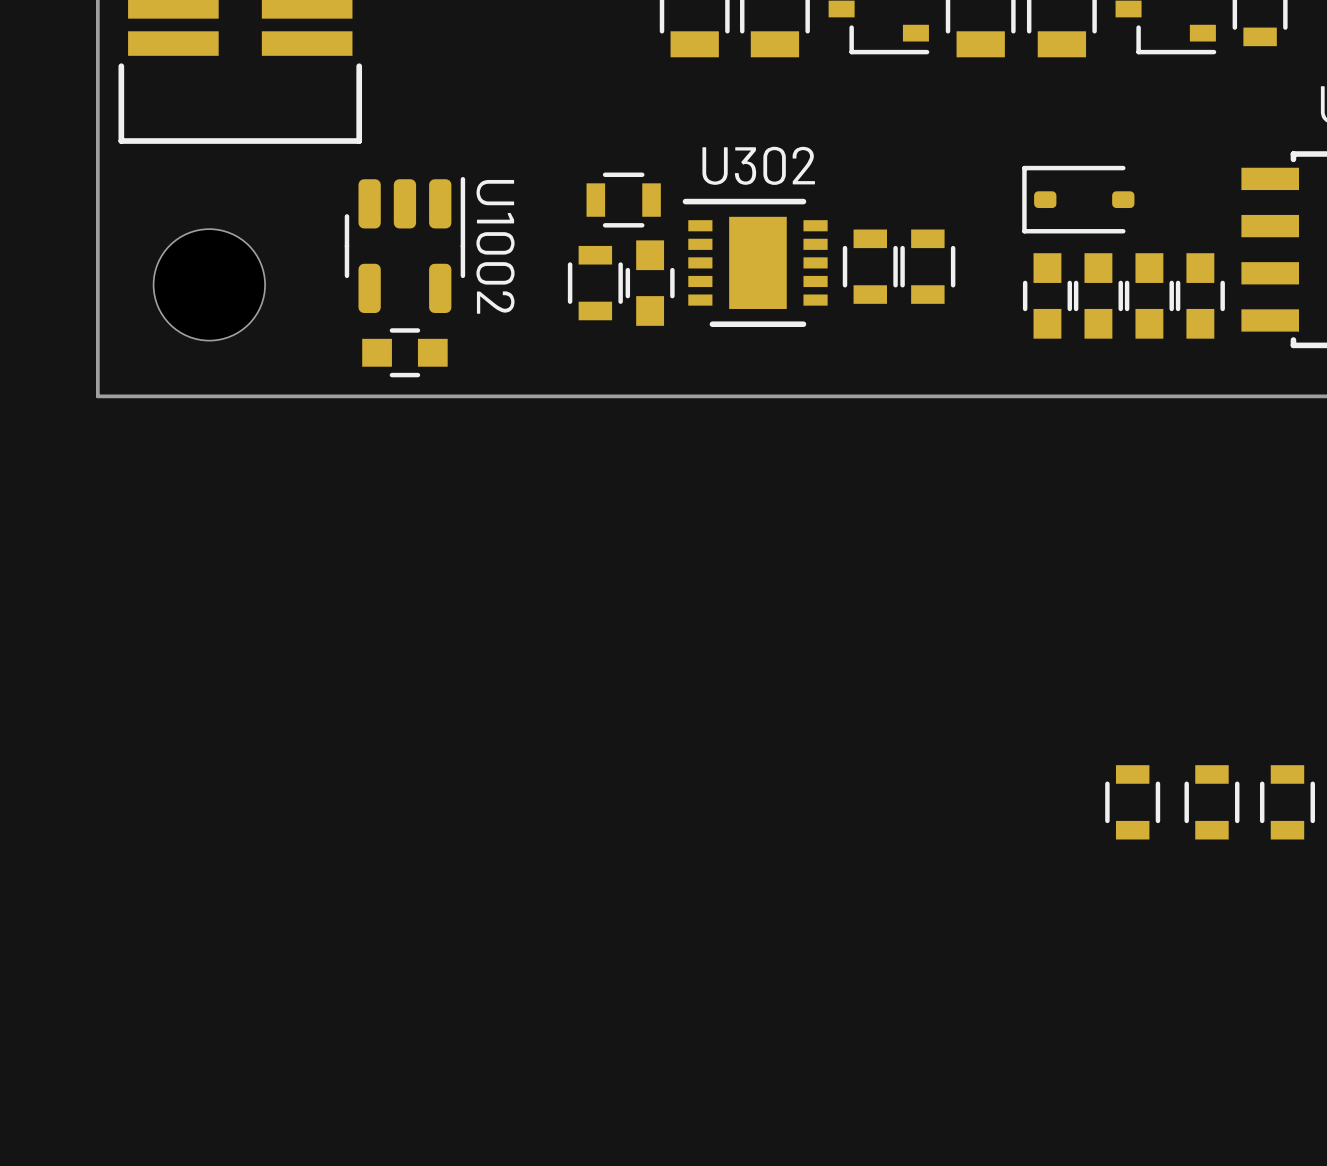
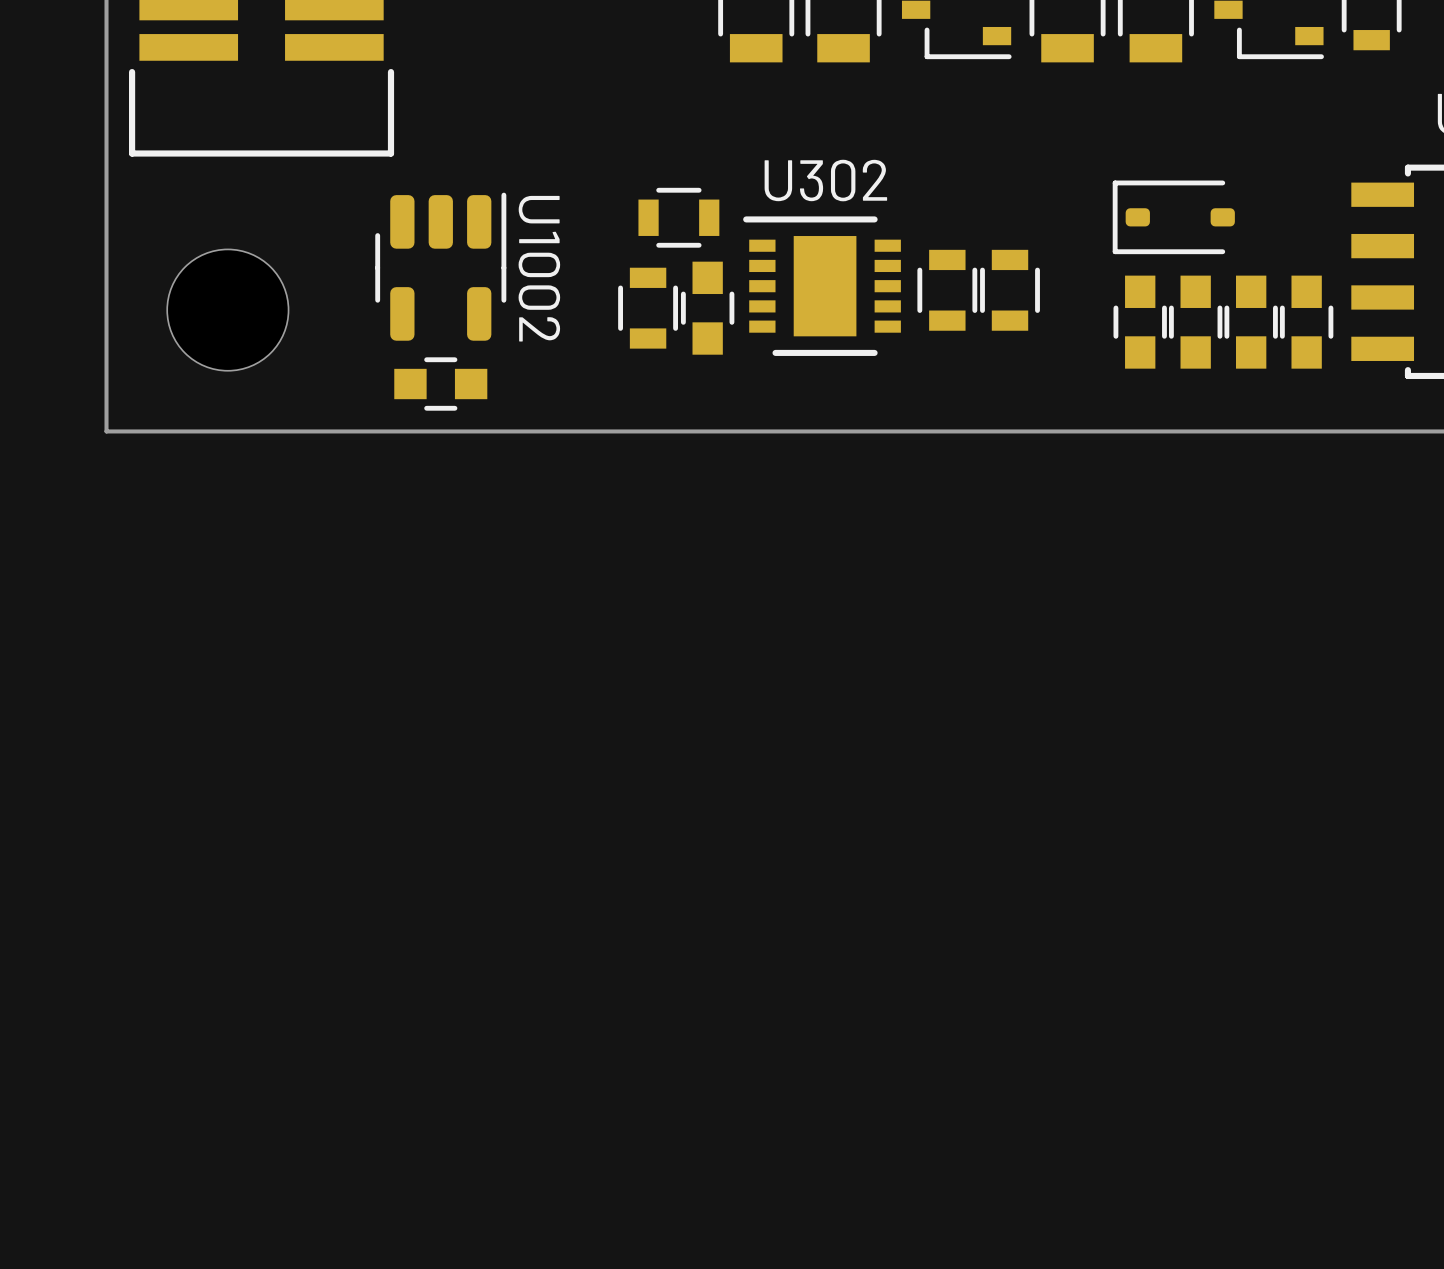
part: (1132, 802) -> none
part: (1211, 802) -> none
part: (1287, 802) -> none

